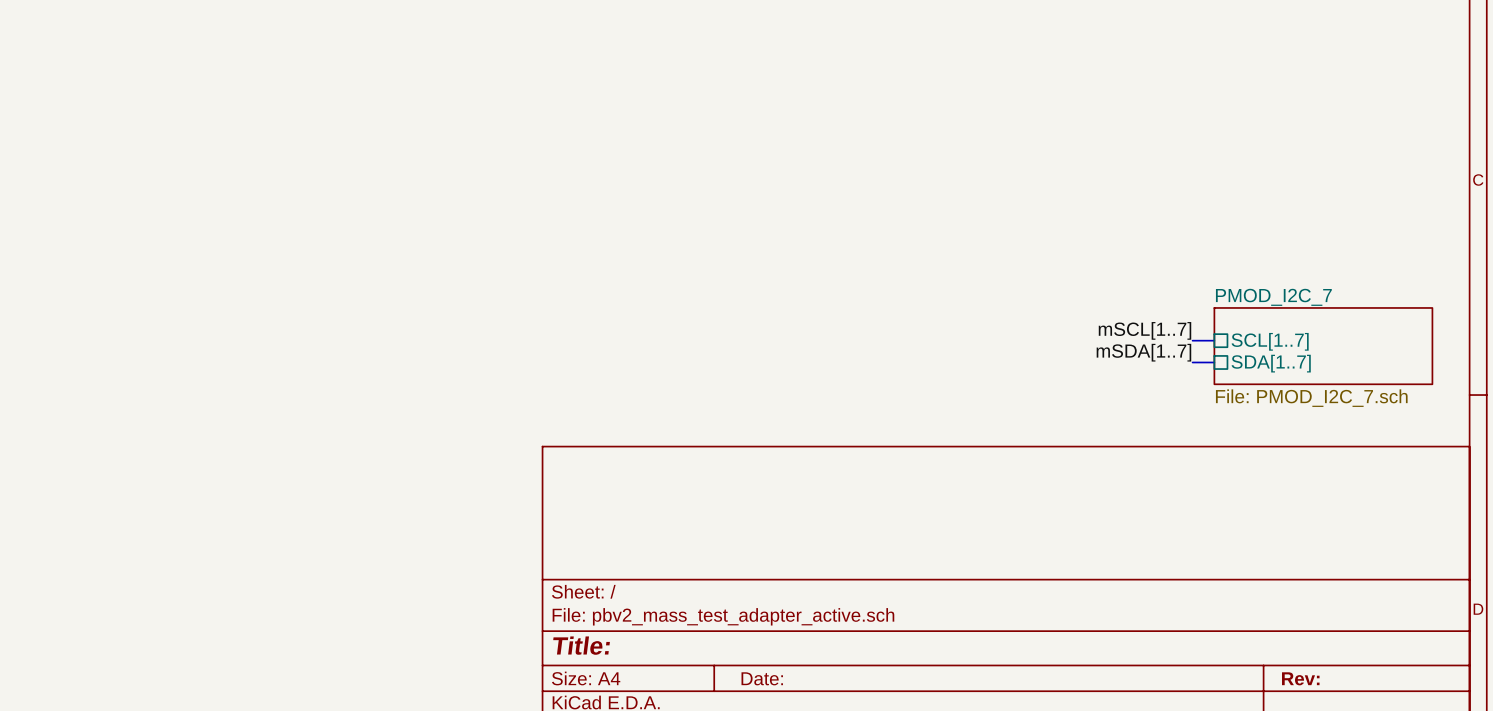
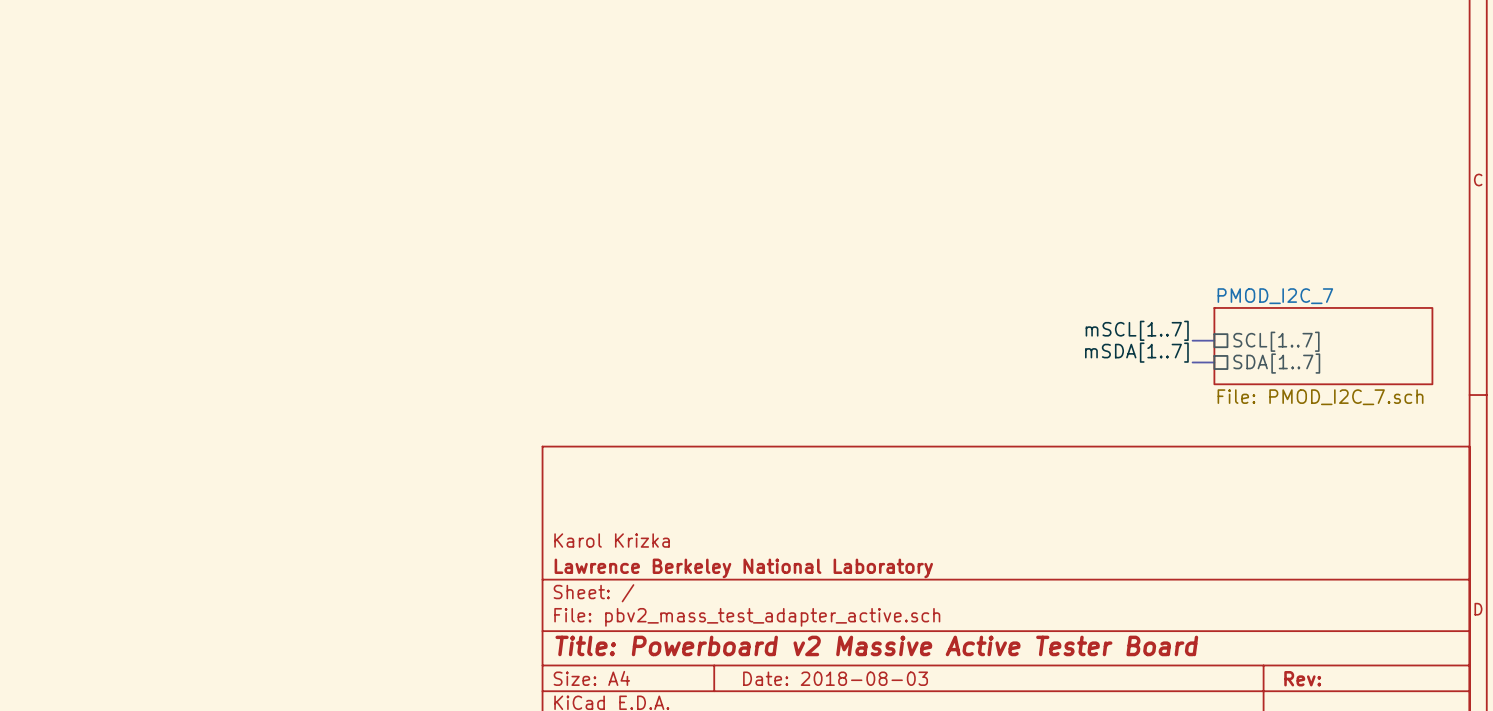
title block: none -> Karol Krizka (612, 540)
title block: none -> Lawrence Berkeley National Laboratory (743, 568)
title block: Title: (581, 645) -> Title: Powerboard v2 Massive Active Tester Board (876, 645)
title block: Date: (762, 678) -> Date: 2018-08-03 (835, 678)

